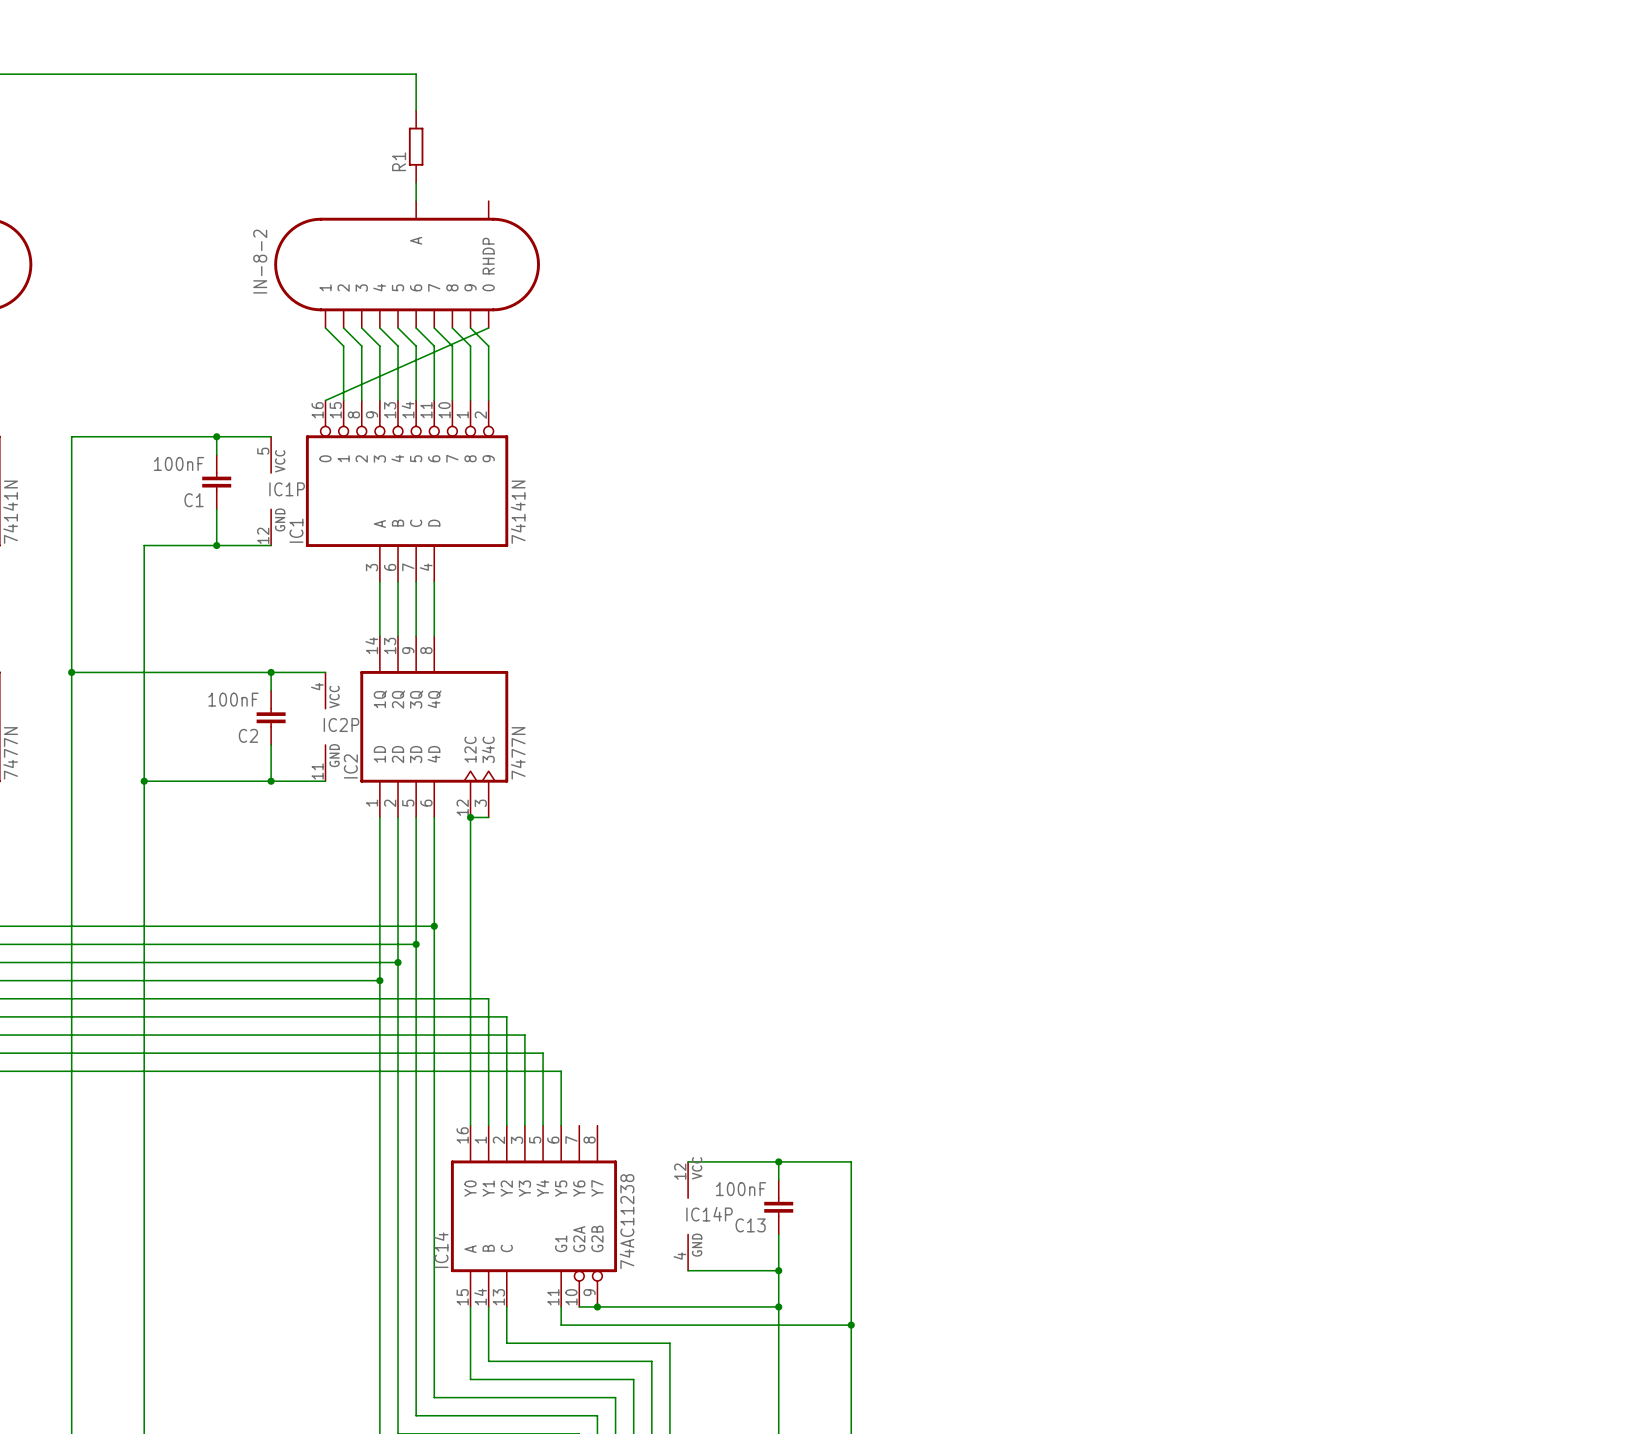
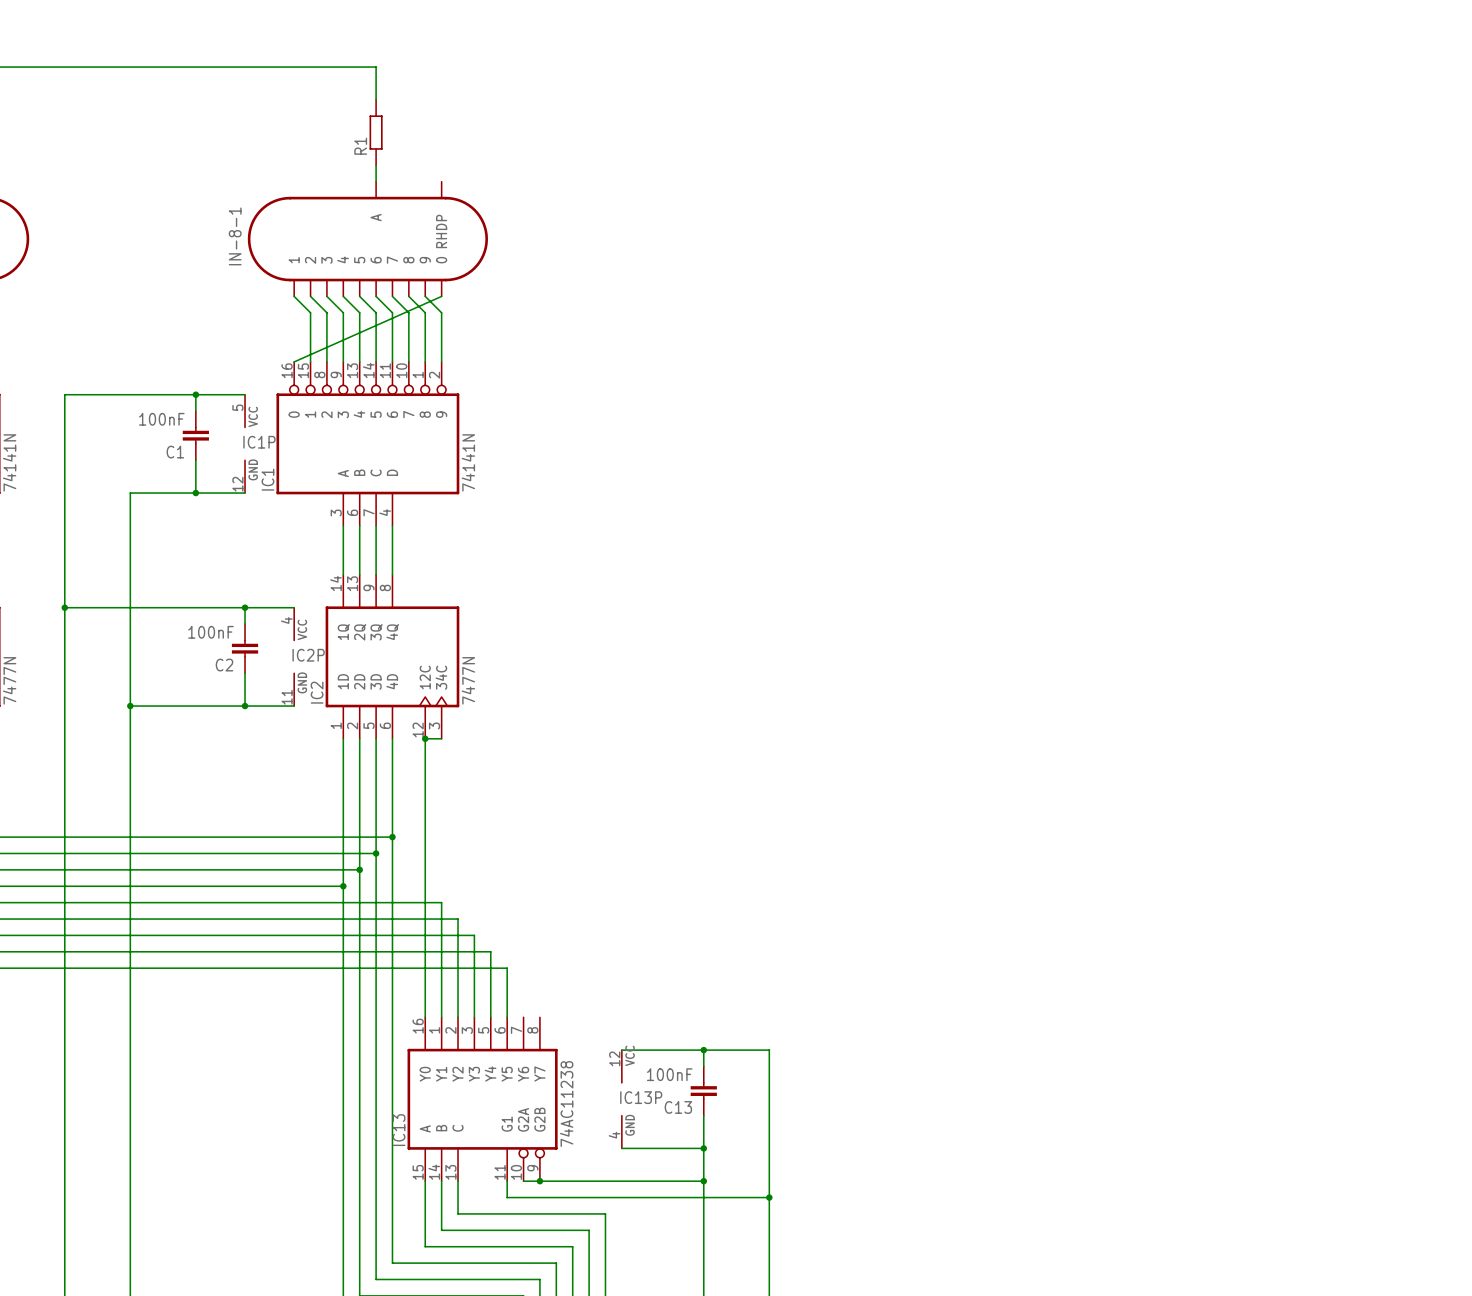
IN-8-2 name: IN-8-2 (260, 261) -> IN-8-1 (235, 236)
IC14P name: IC14P (709, 1214) -> IC13P (641, 1097)
IC14 name: IC14 (441, 1250) -> IC13 (399, 1130)

